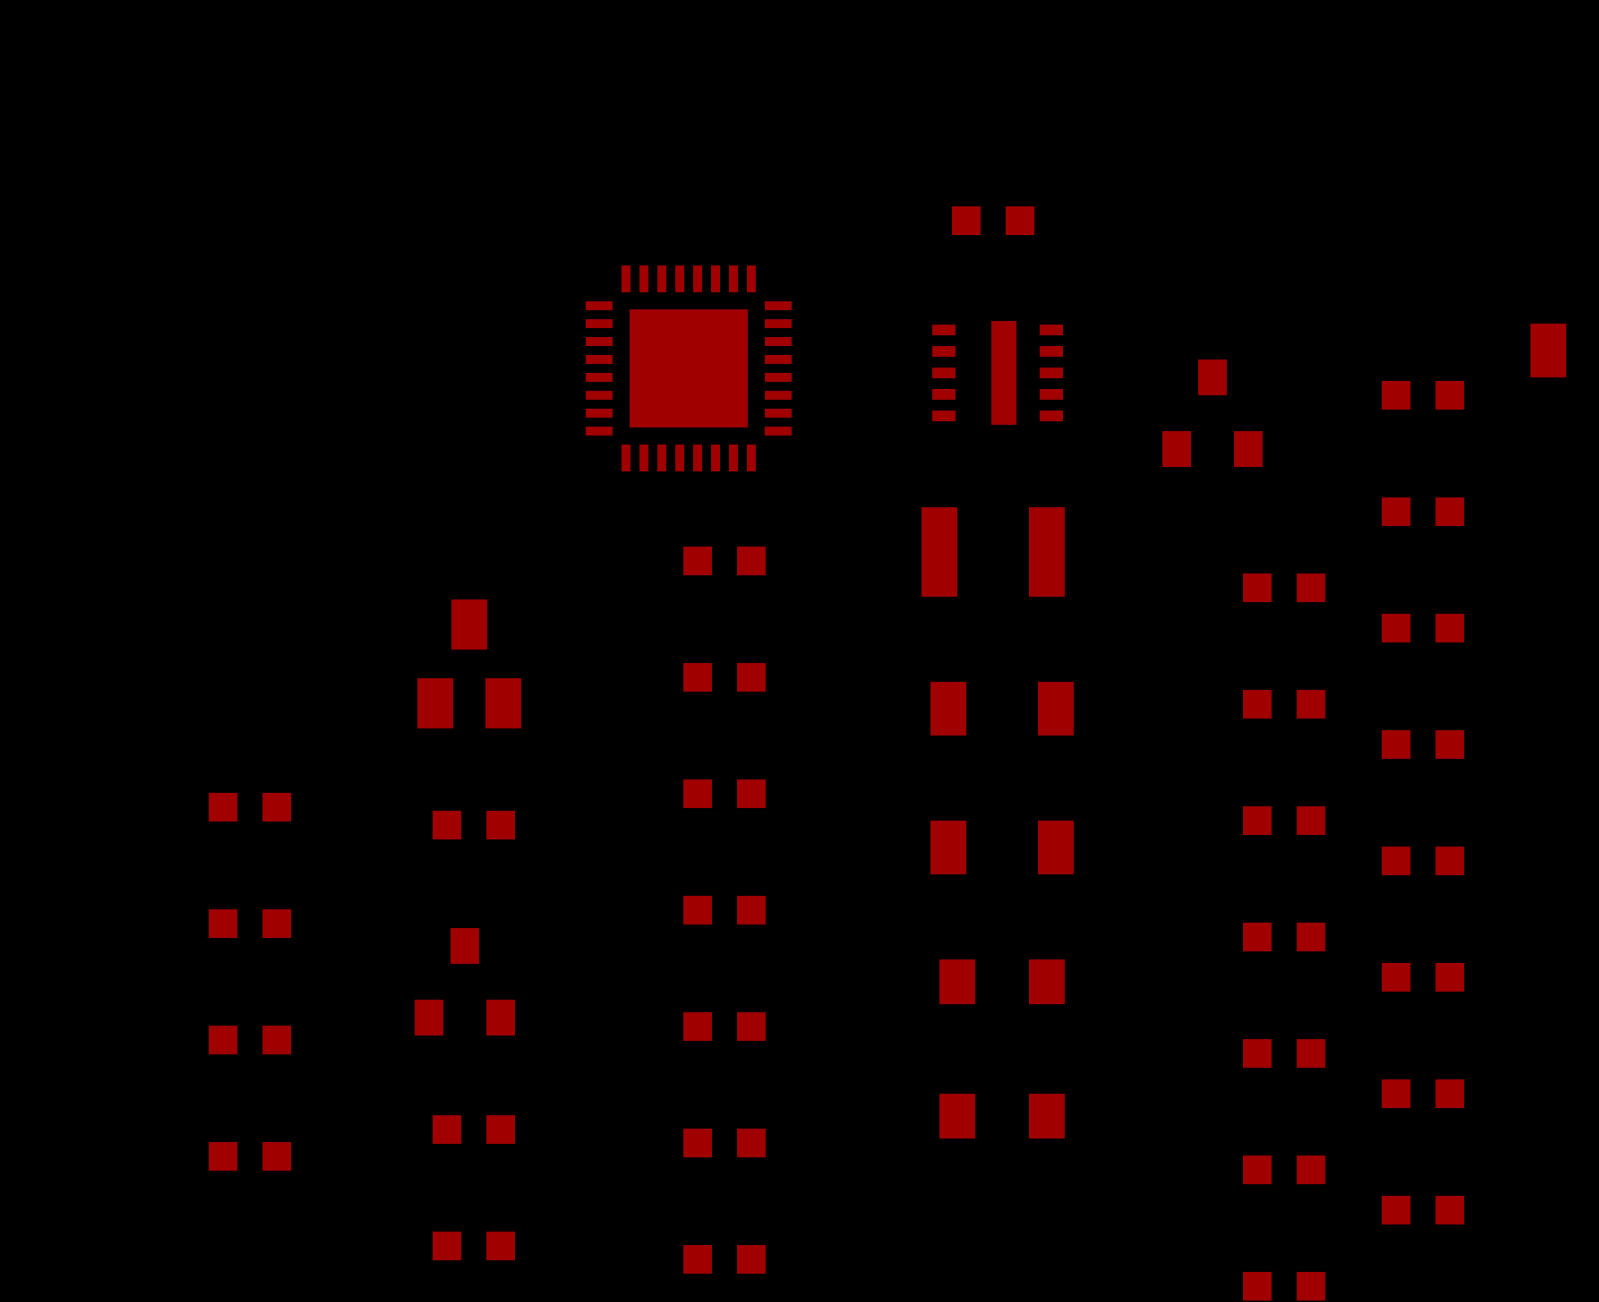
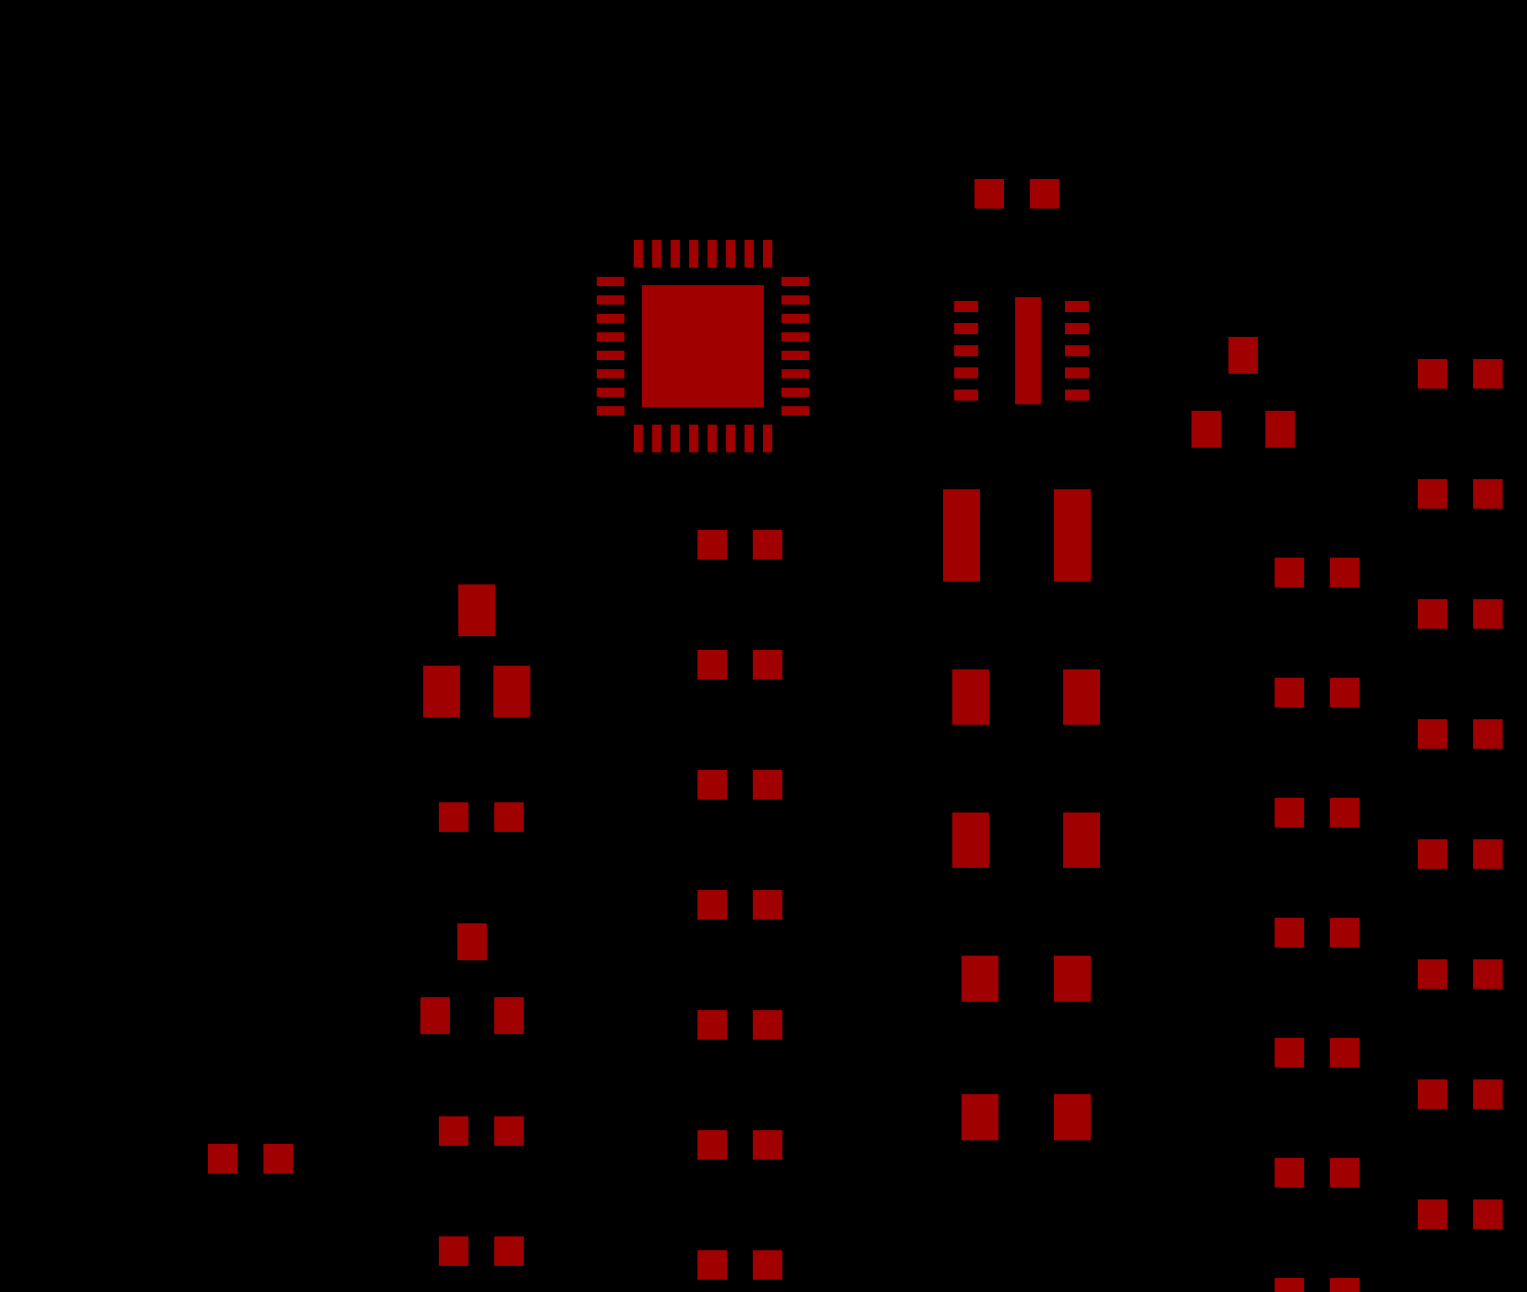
part: (249, 807) -> none
part: (249, 923) -> none
part: (249, 1040) -> none

